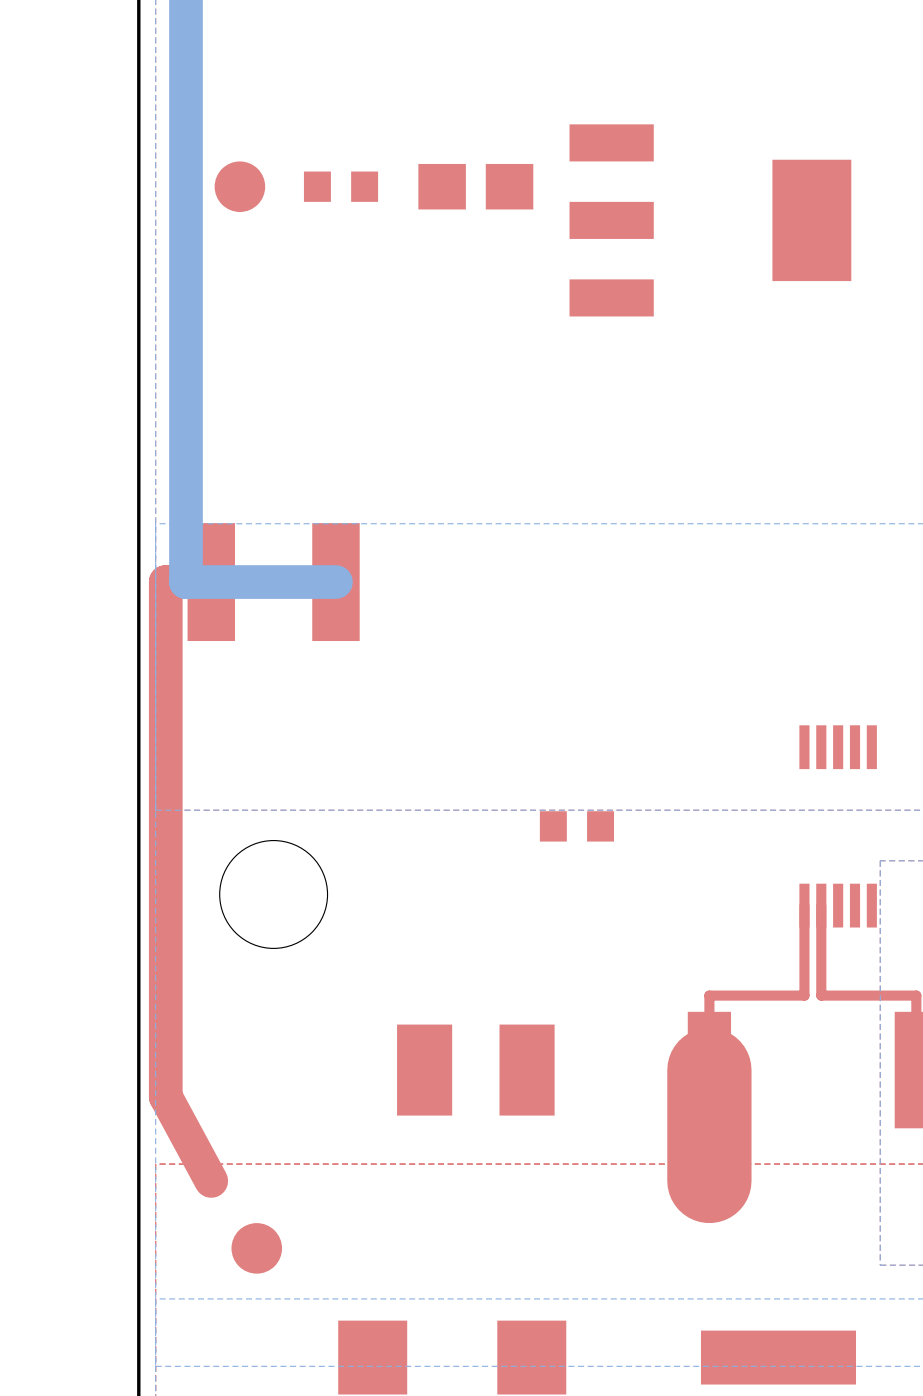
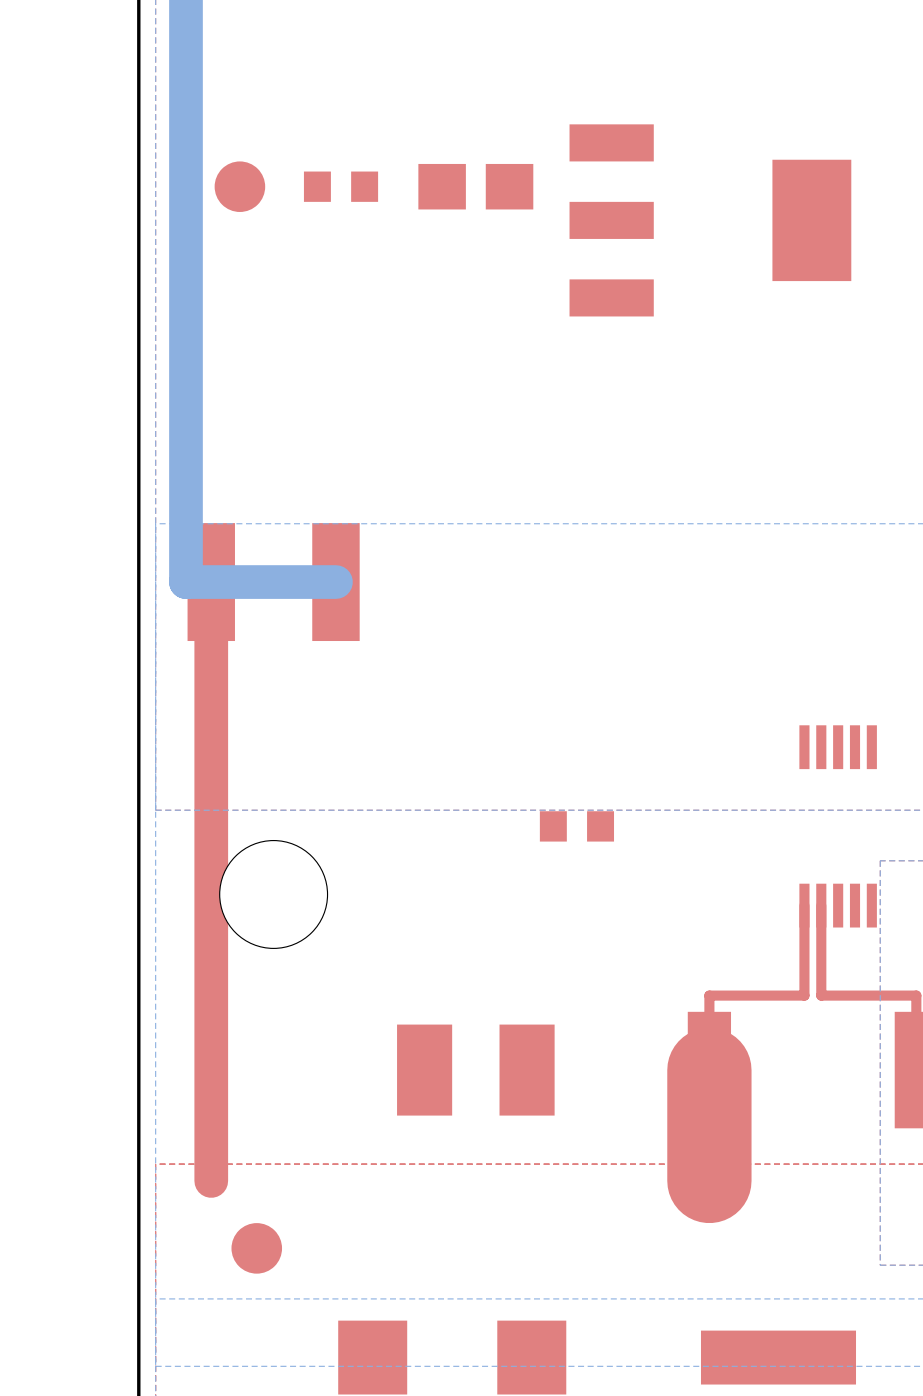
top track: (211, 582) (165, 582) (165, 1096) (211, 1180) -> (211, 582) (211, 1180)

